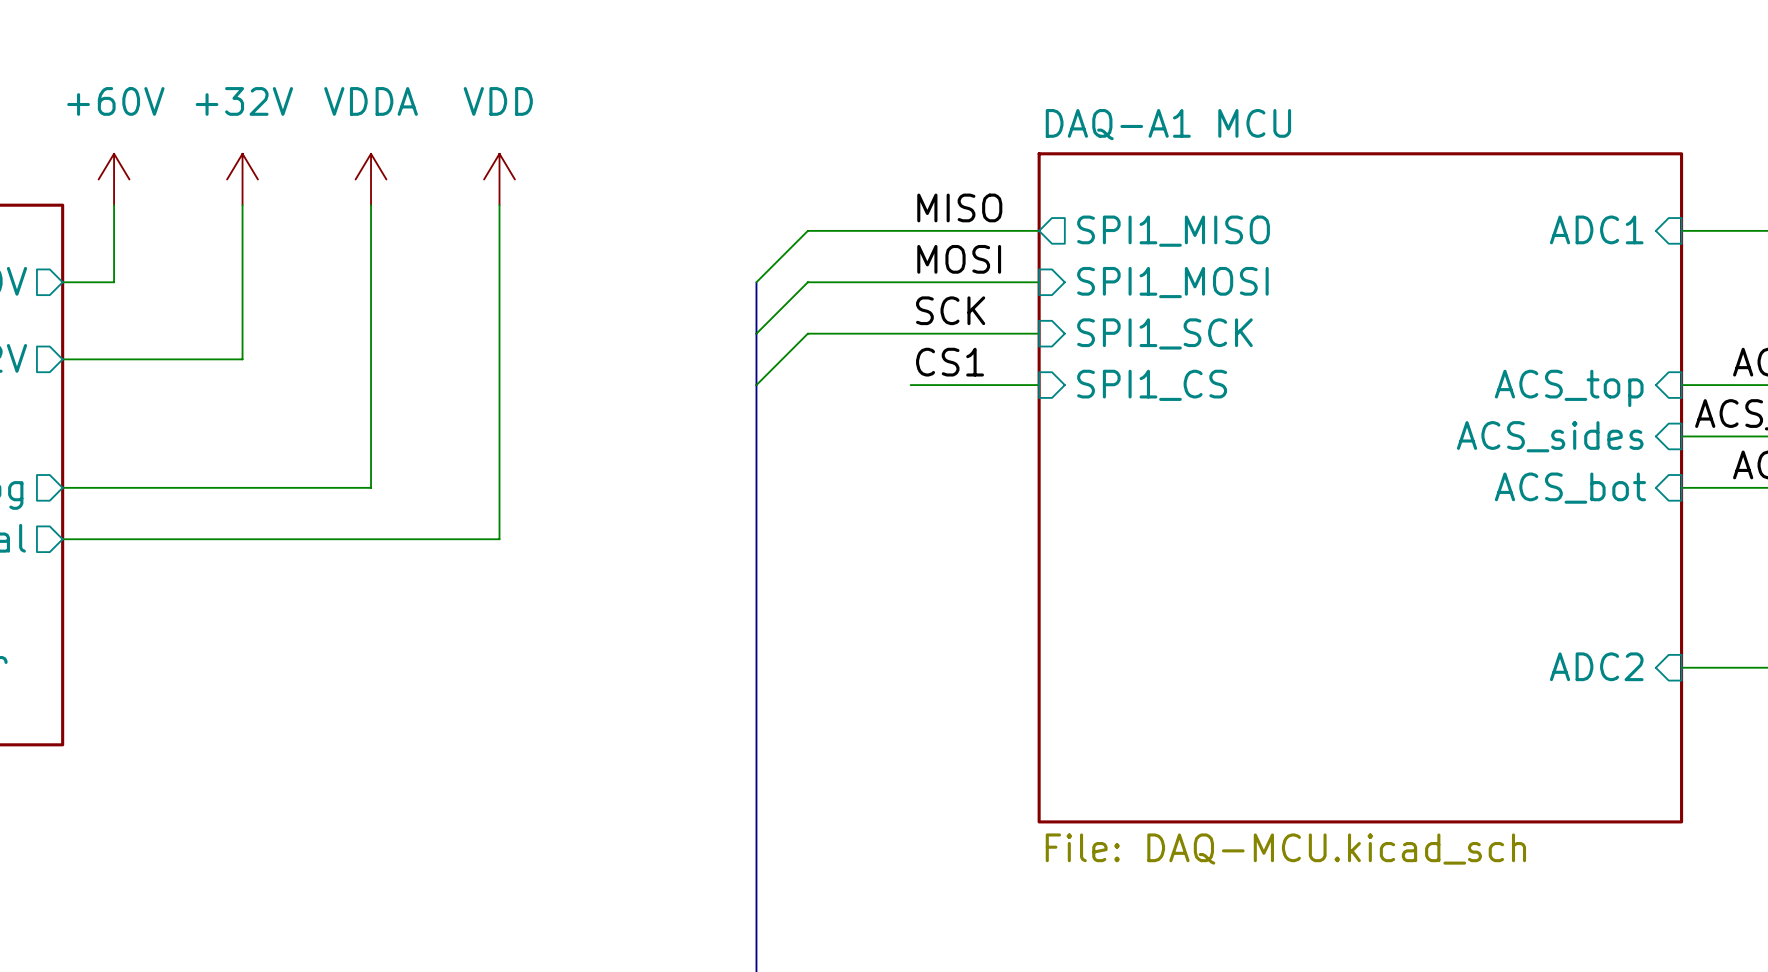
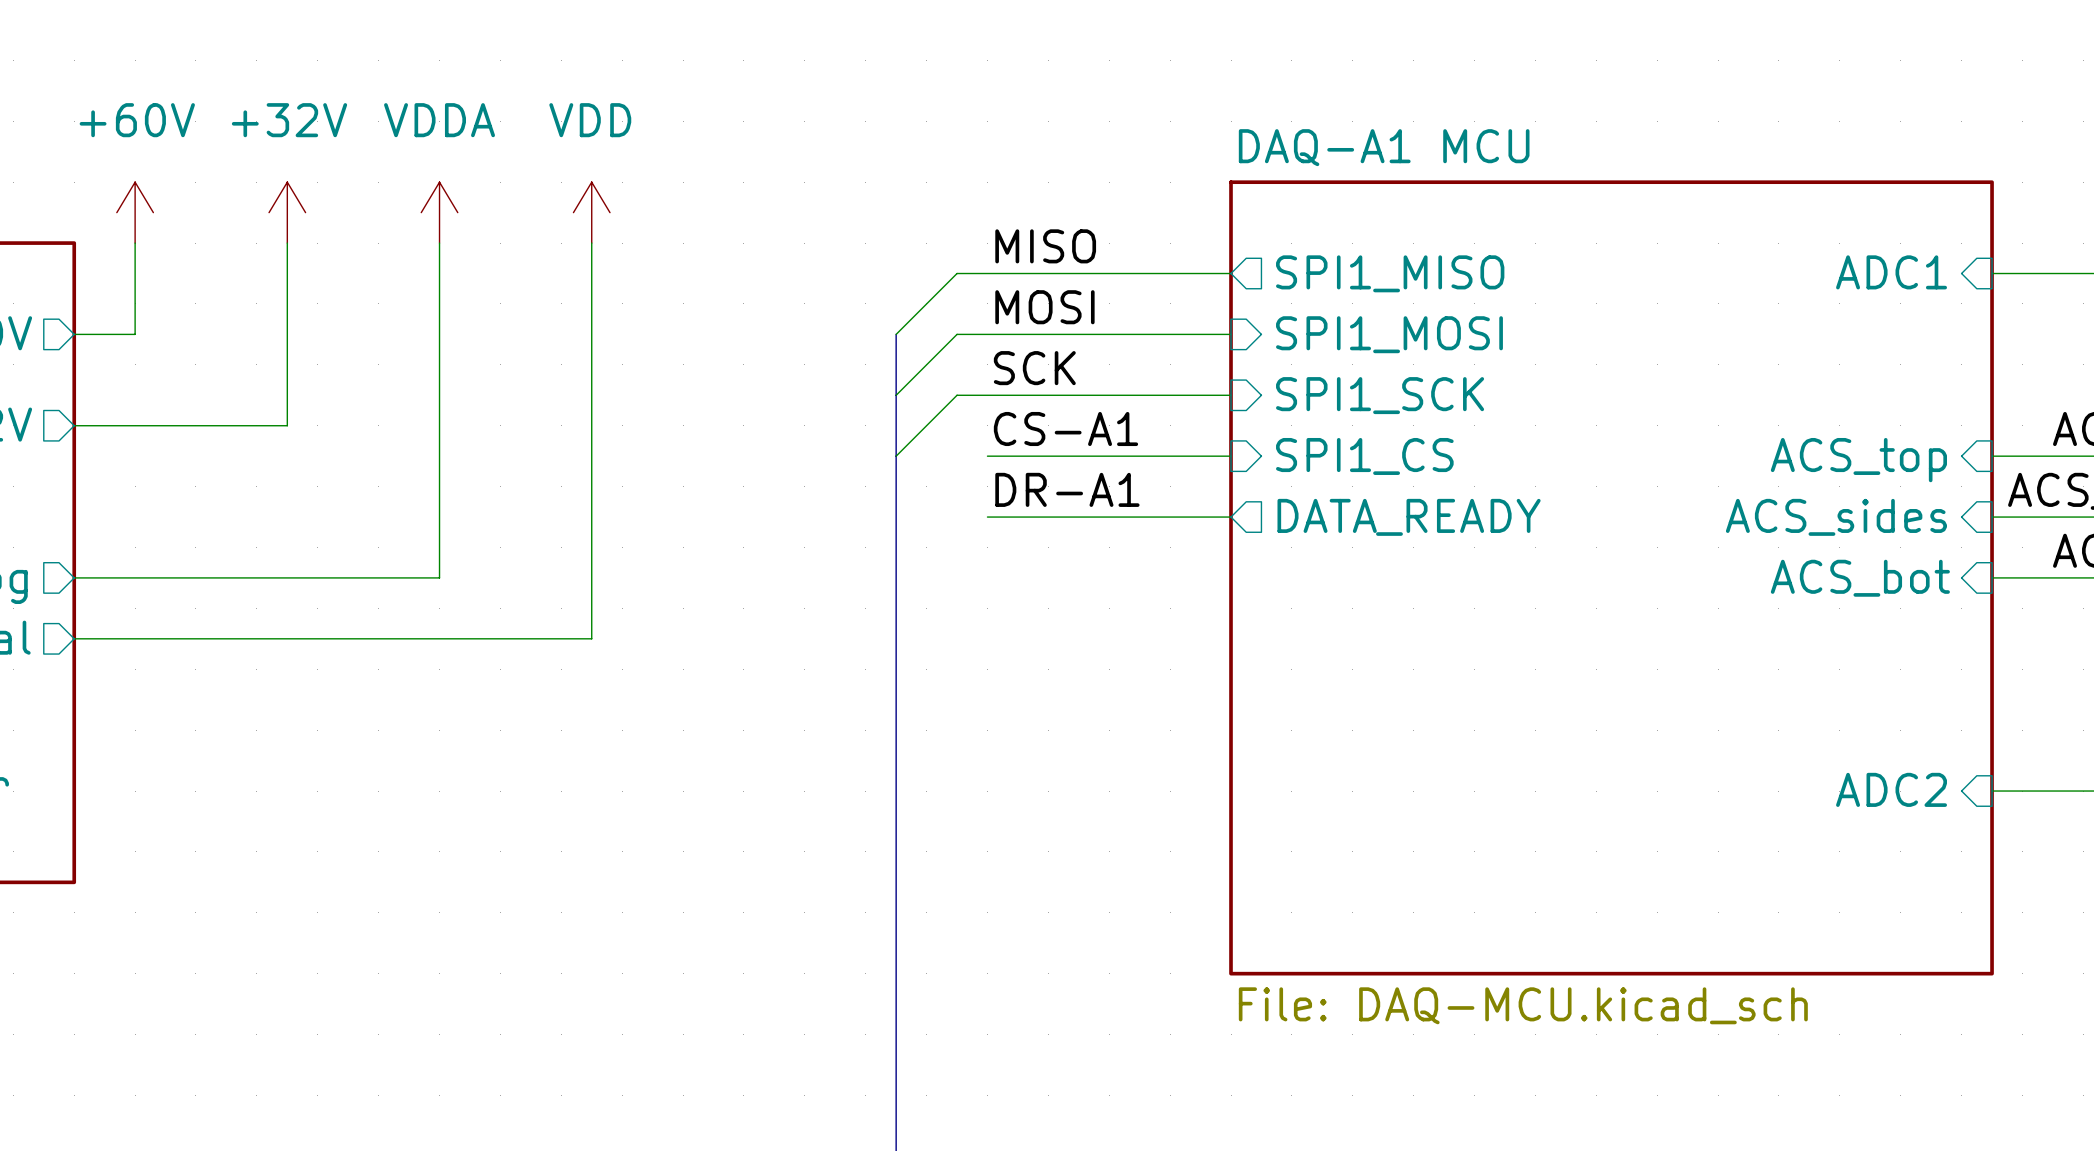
label position: MISO (959, 207) -> MISO (1045, 246)
label position: MOSI (959, 259) -> MOSI (1044, 307)
label position: SCK (950, 310) -> SCK (1034, 368)
label: CS1 (950, 362) -> CS-A1 (1065, 429)
wire: none -> (987, 456) (1078, 456)
label: none -> DR-A1 (1067, 489)
wire: none -> (987, 517) (1231, 517)
sheet pin: none -> DATA_READY (1409, 517)

